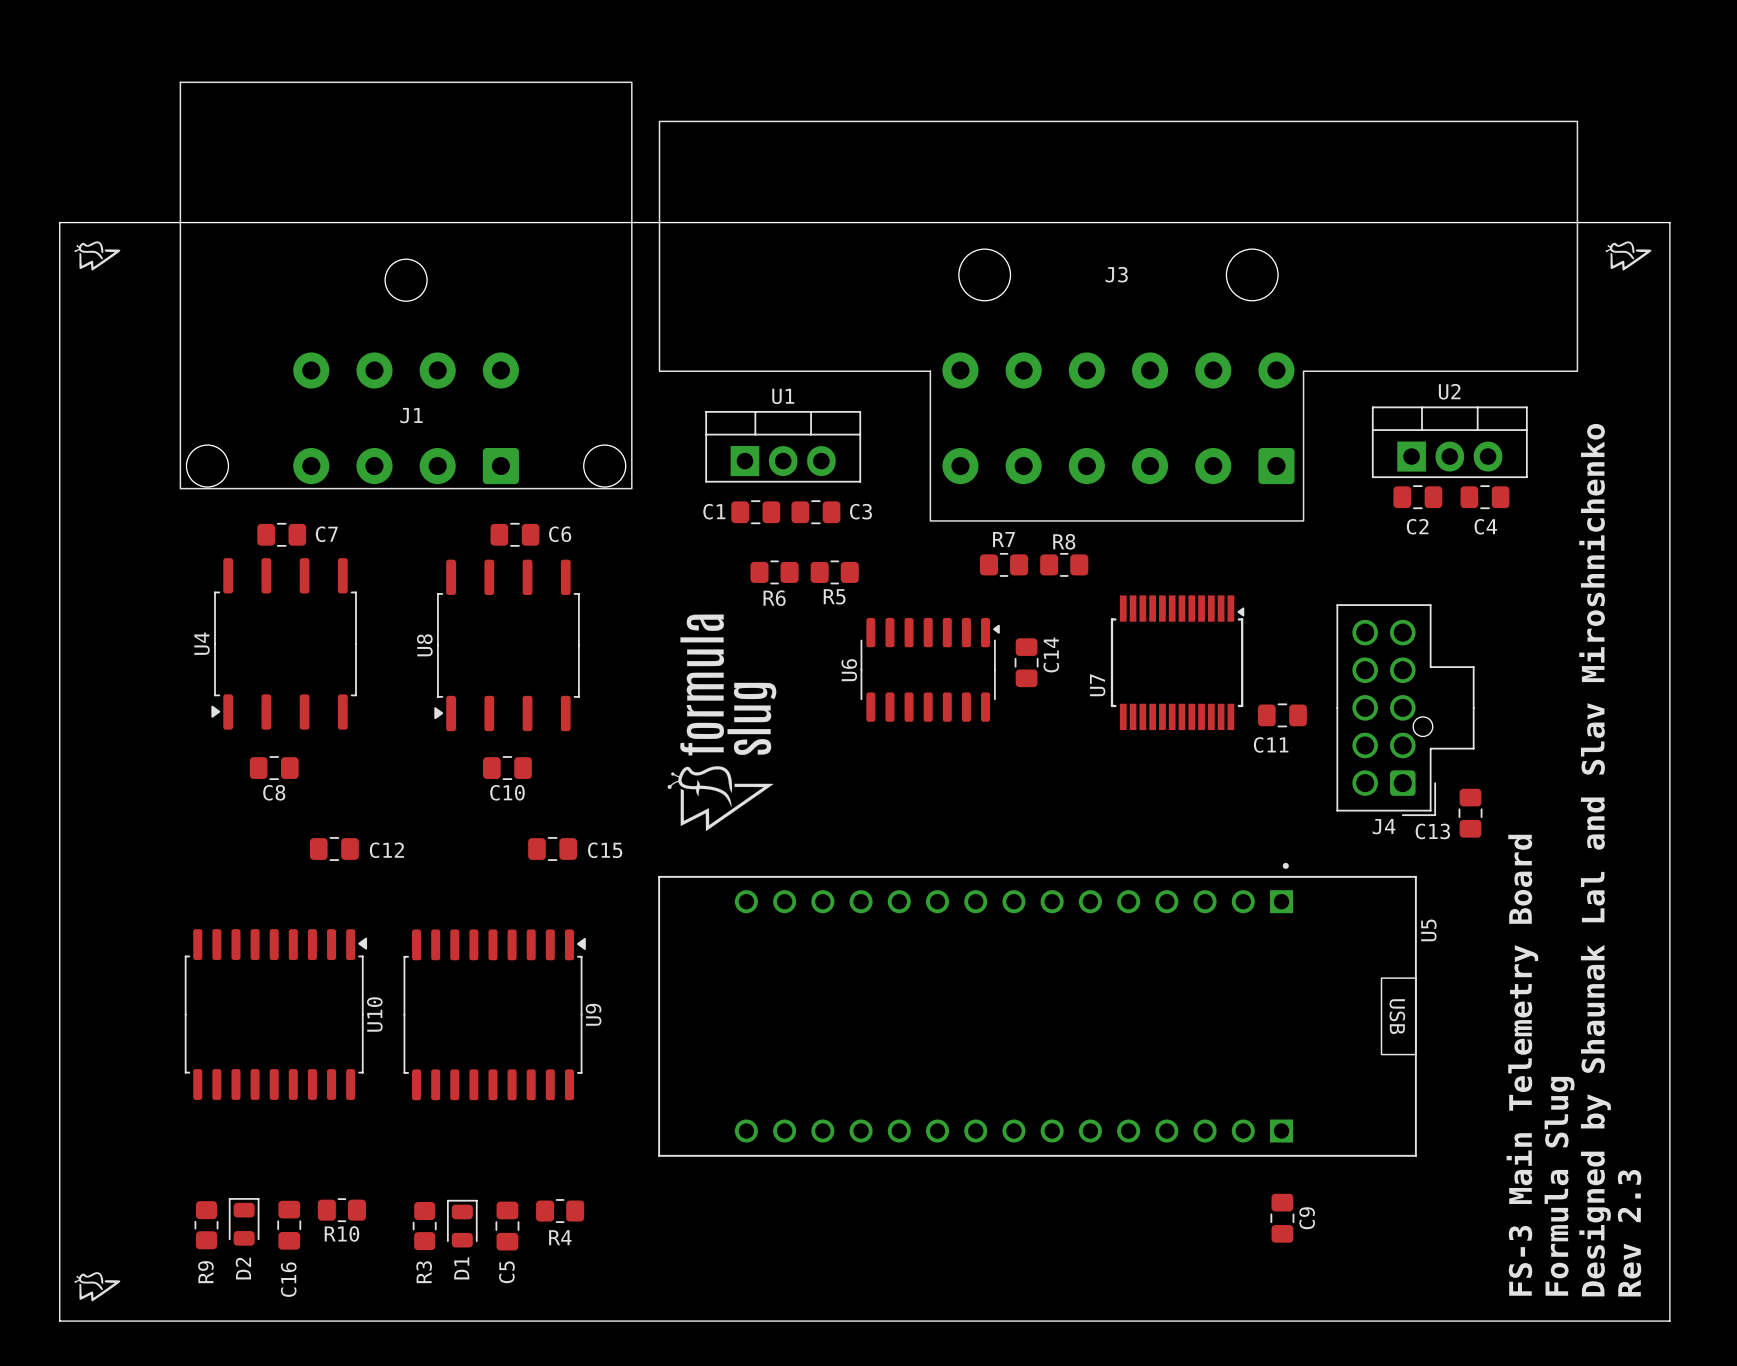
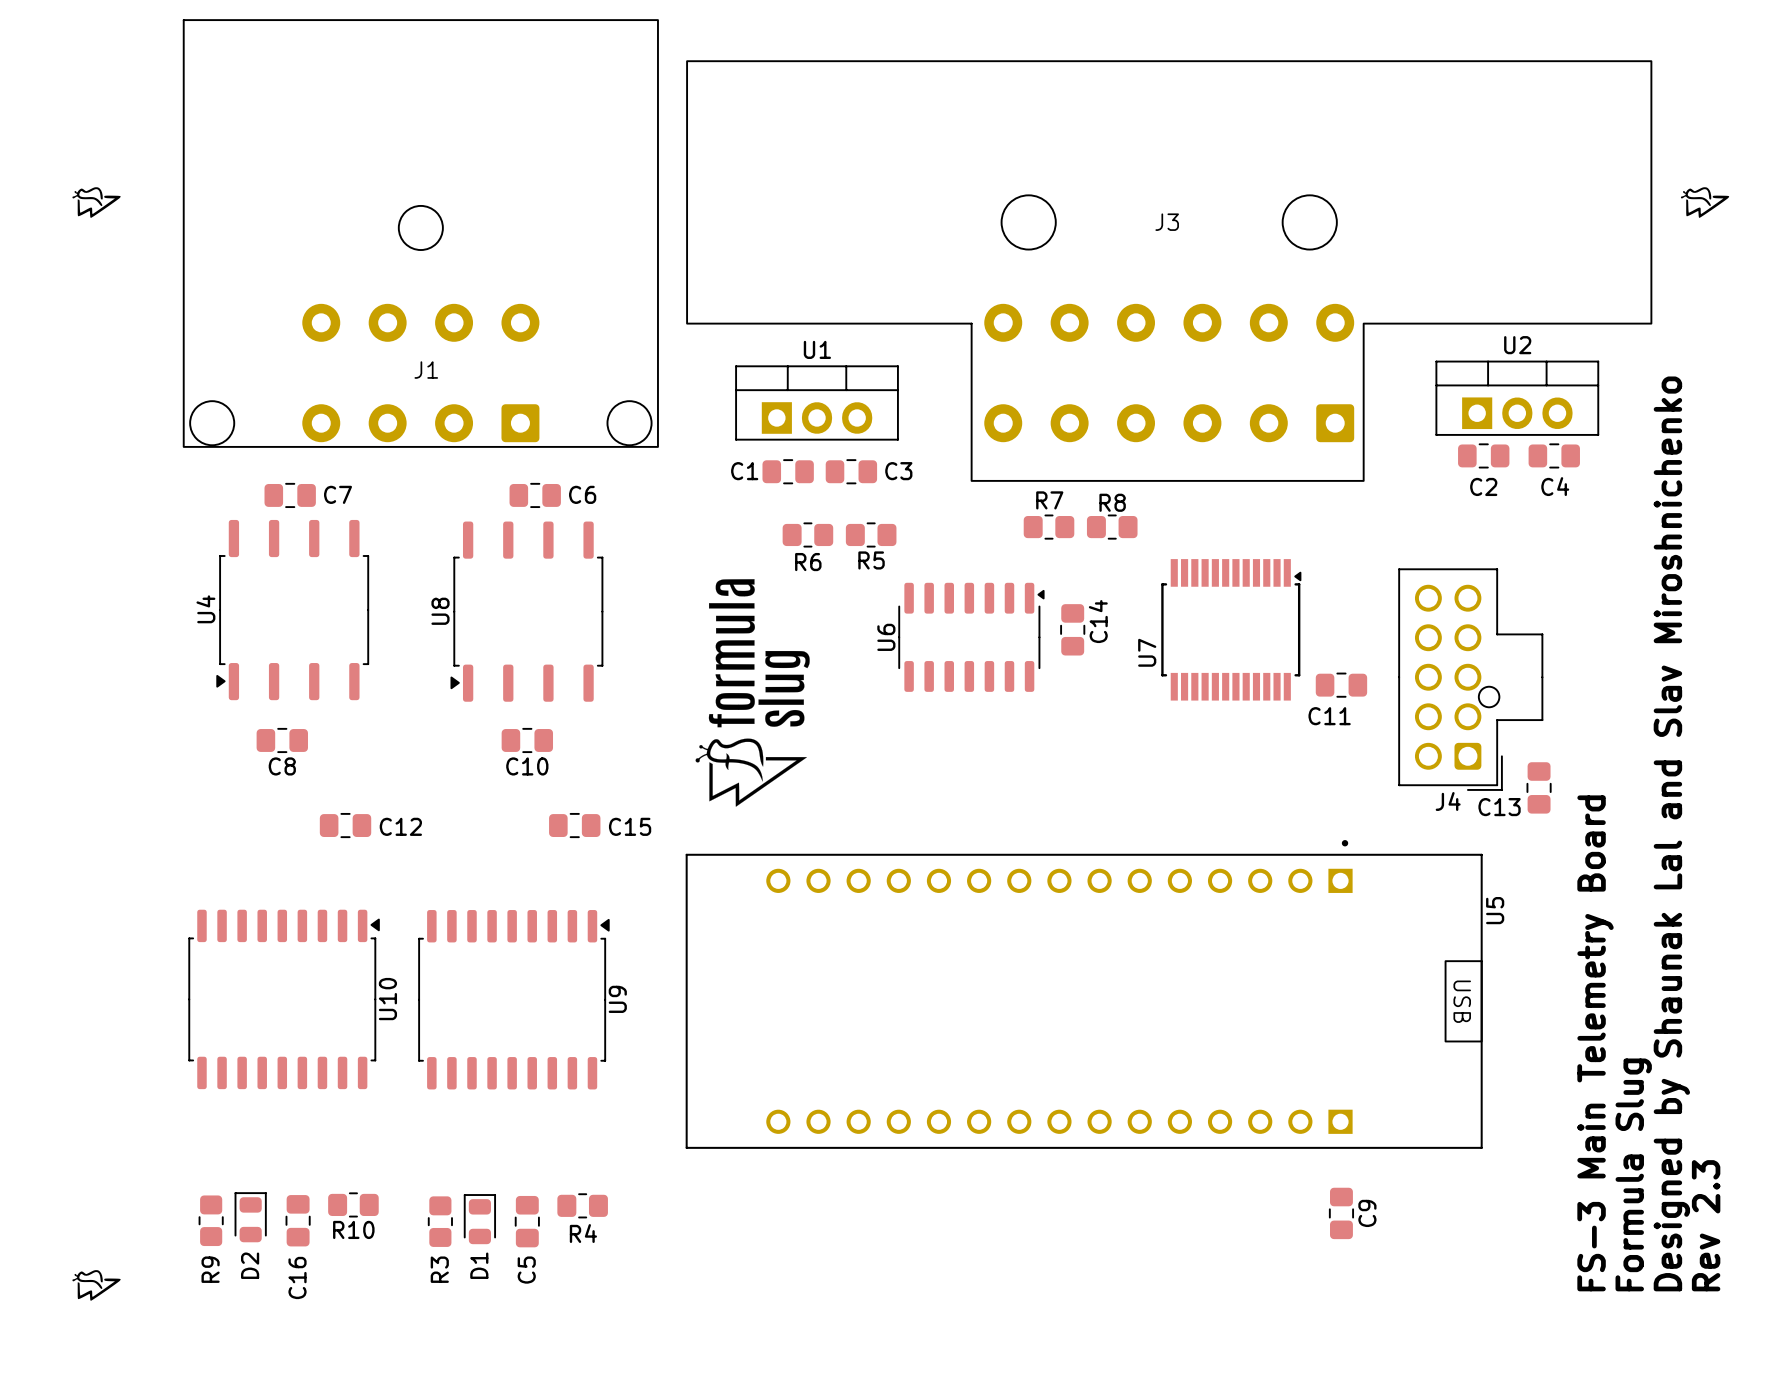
board edge: (59, 222) (1669, 222) (1669, 1321) (59, 1321) (59, 222) -> none

